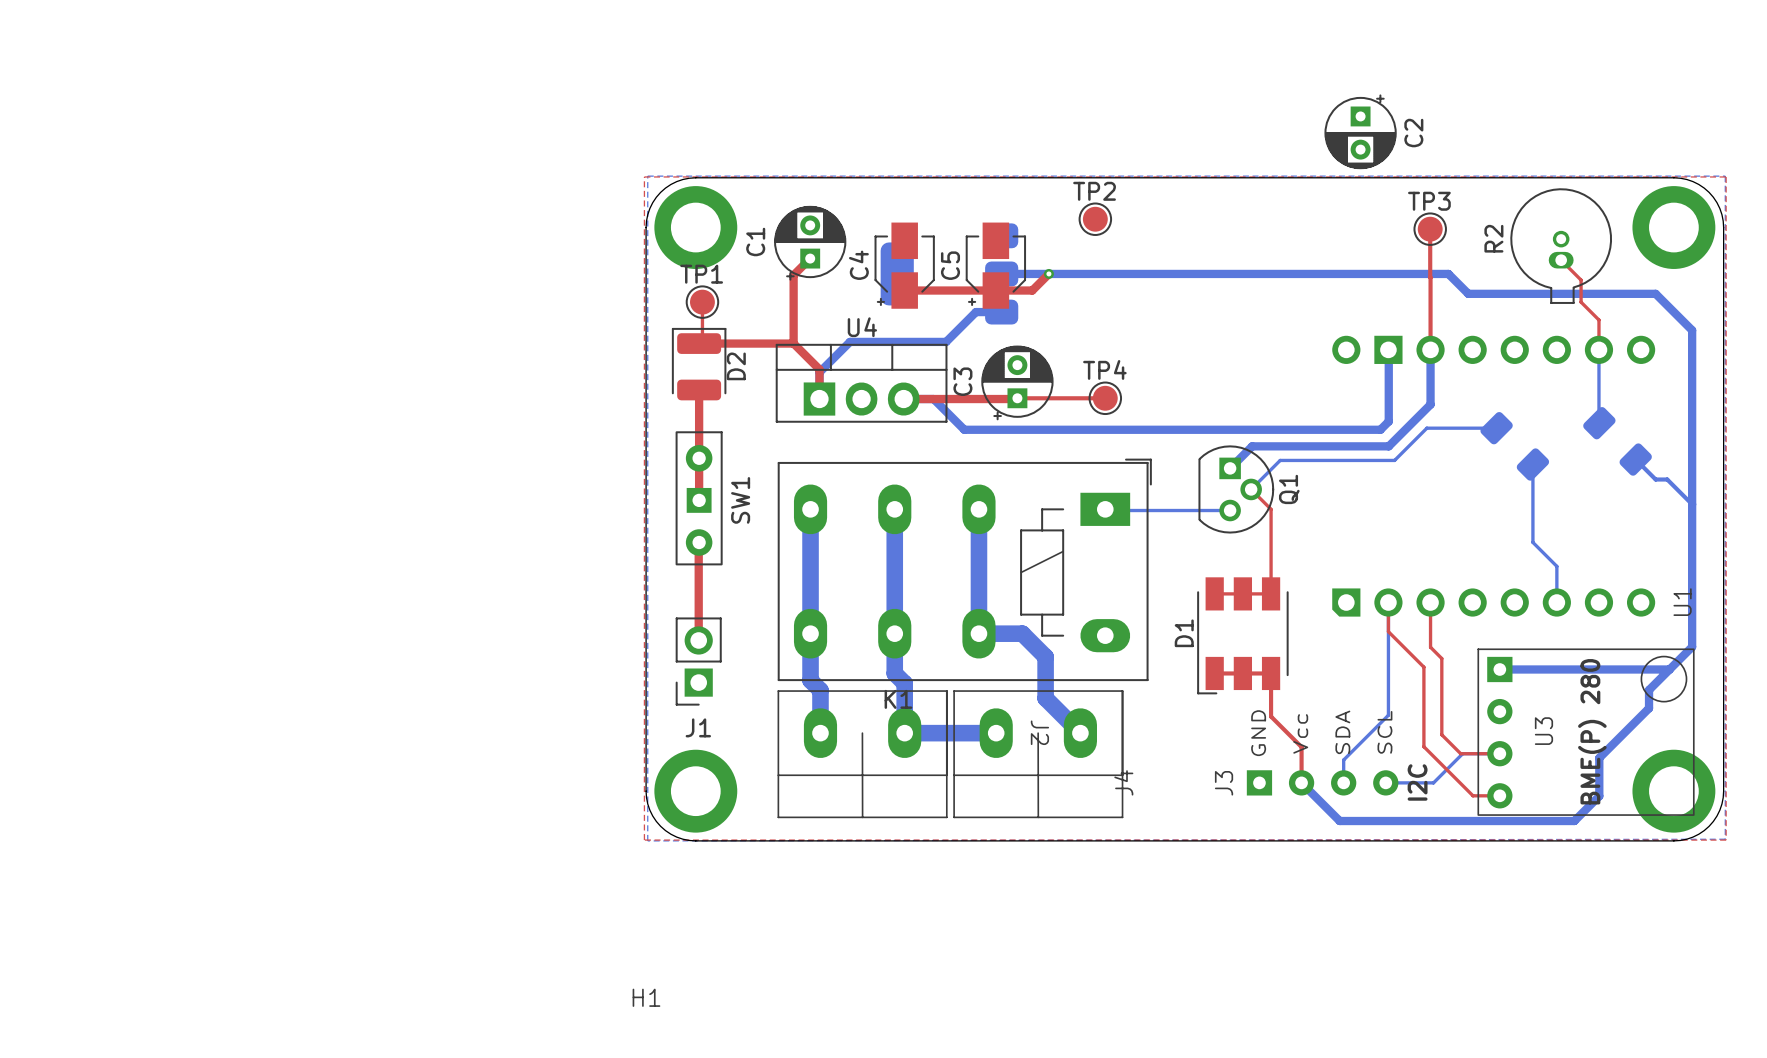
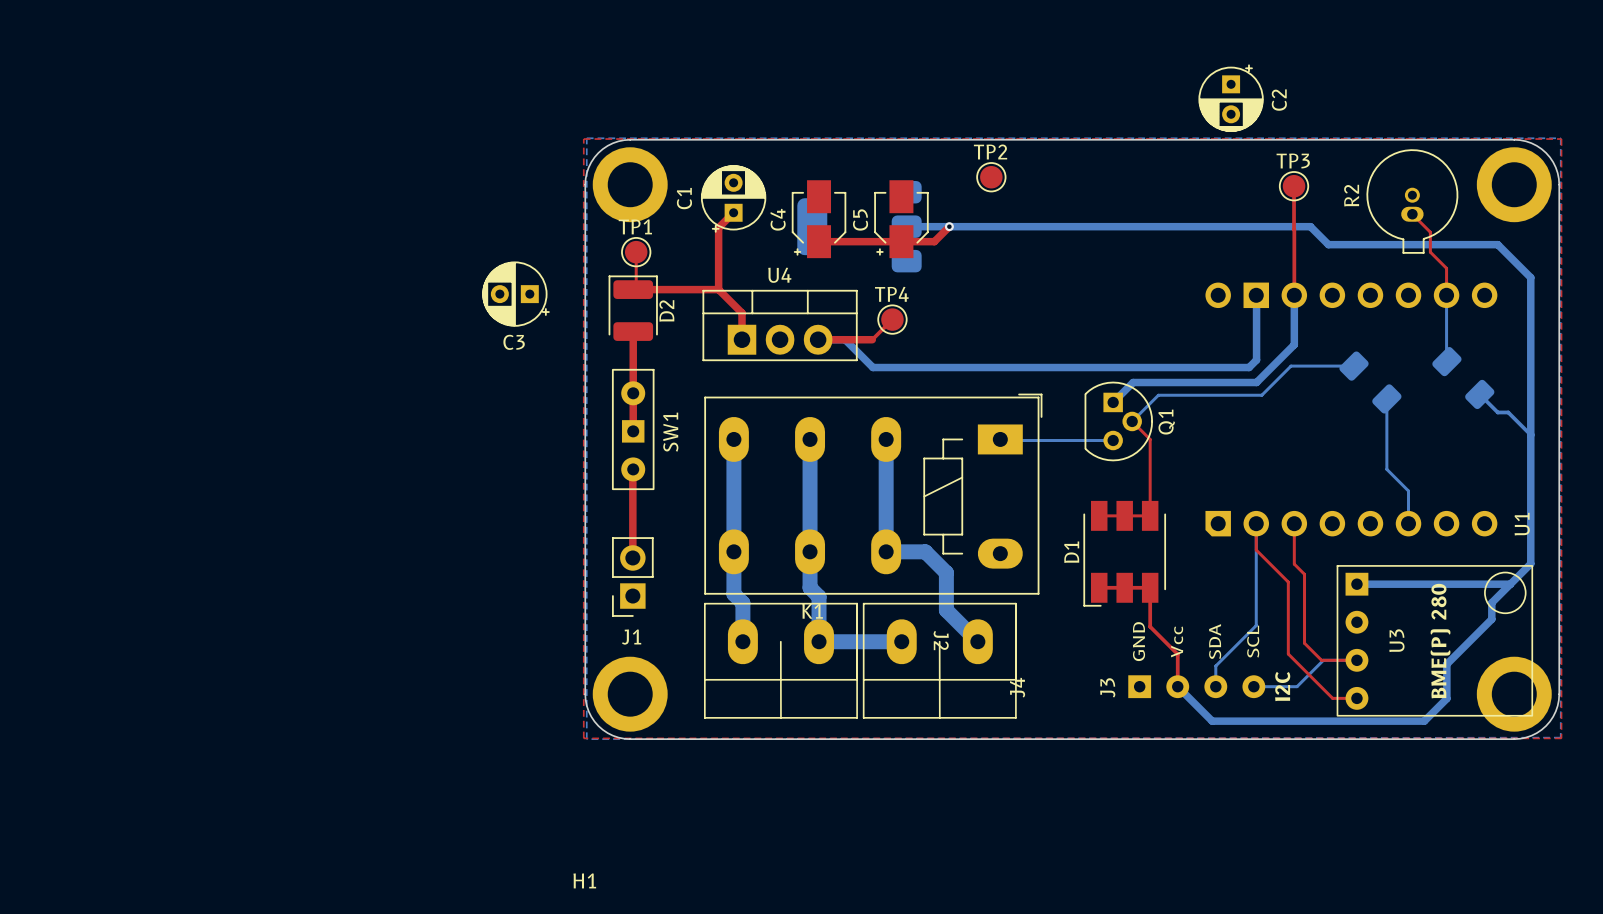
bottom track: (1001, 312) (975, 312) (946, 341) (849, 341) (819, 372) (819, 399) -> none
C3 rotation: 0° (1017, 382) -> 90° counterclockwise (515, 294)
C3 position: (1017, 382) -> (515, 294)
top track: (1105, 398) (963, 399) -> (892, 319) (872, 339)
TP4 position: (1105, 398) -> (892, 319)

